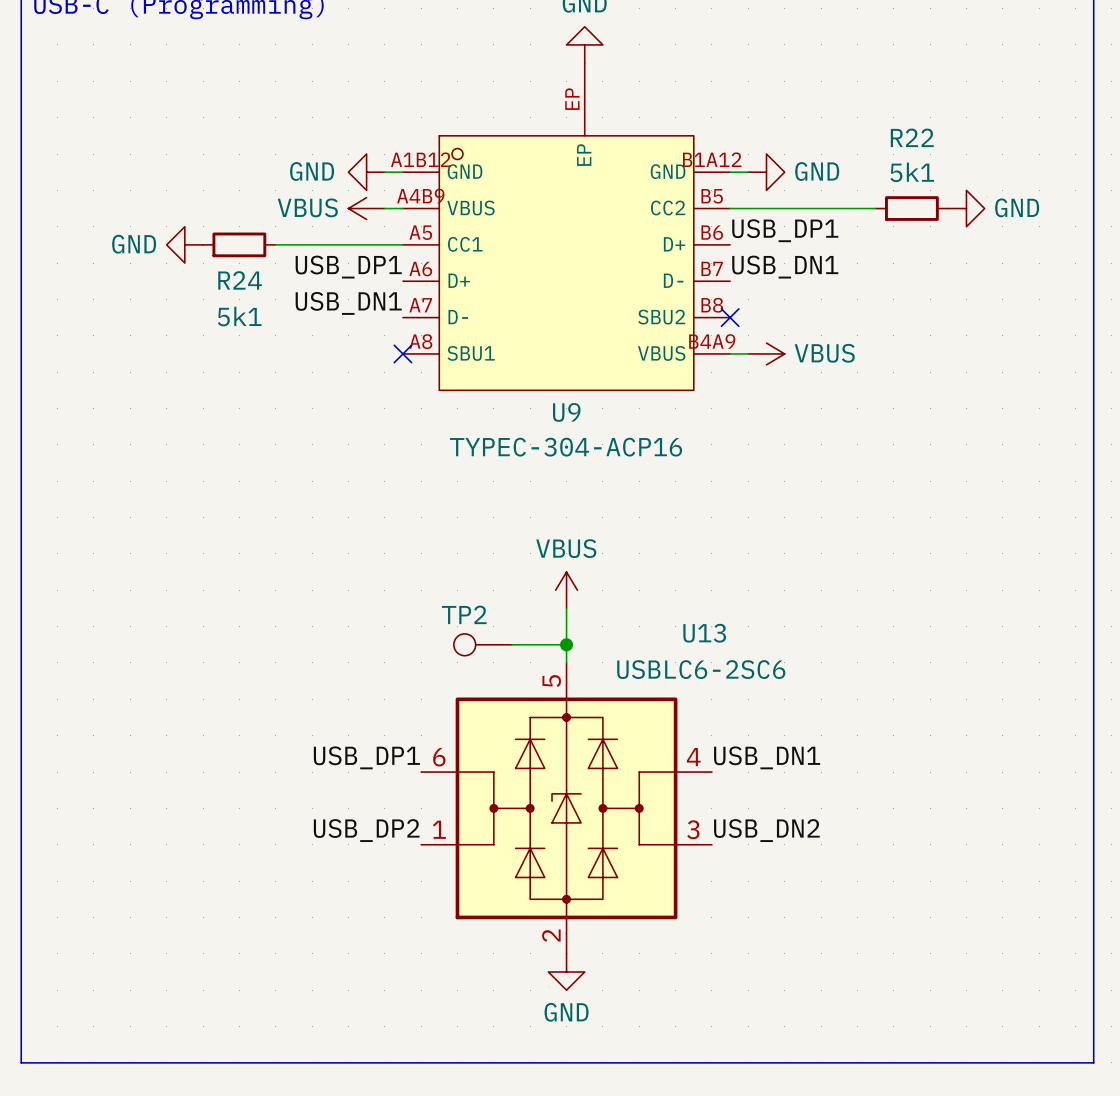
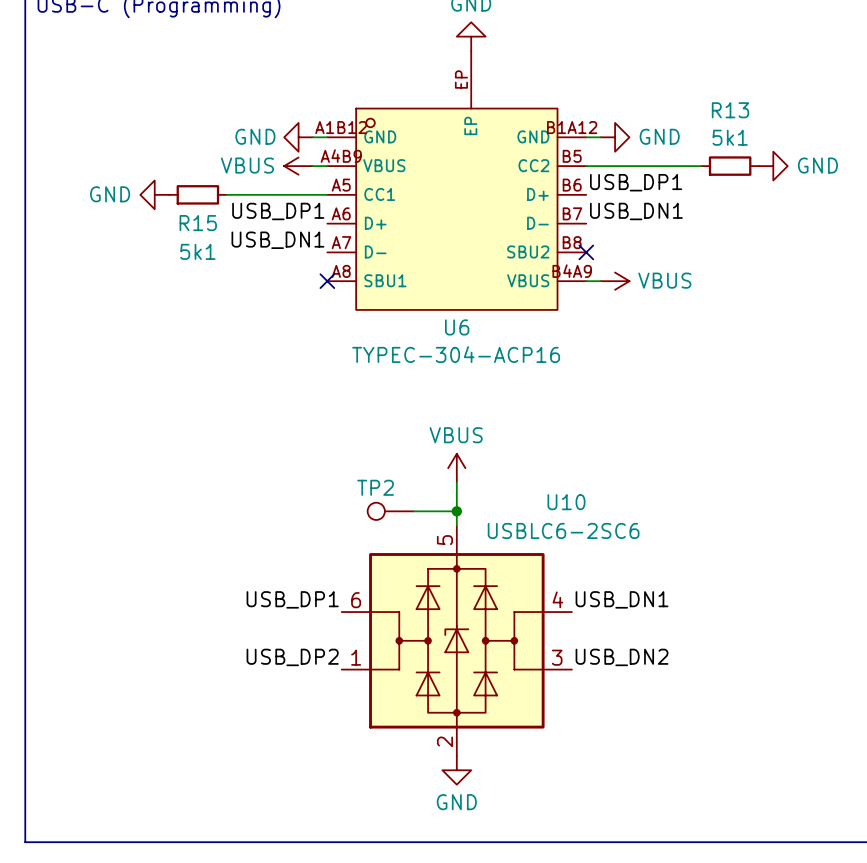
R22 name: R22 (912, 137) -> R13 (730, 110)
R24 name: R24 (240, 280) -> R15 (198, 223)
U9 name: U9 (566, 412) -> U6 (457, 327)
U13 name: U13 (704, 633) -> U10 (566, 502)

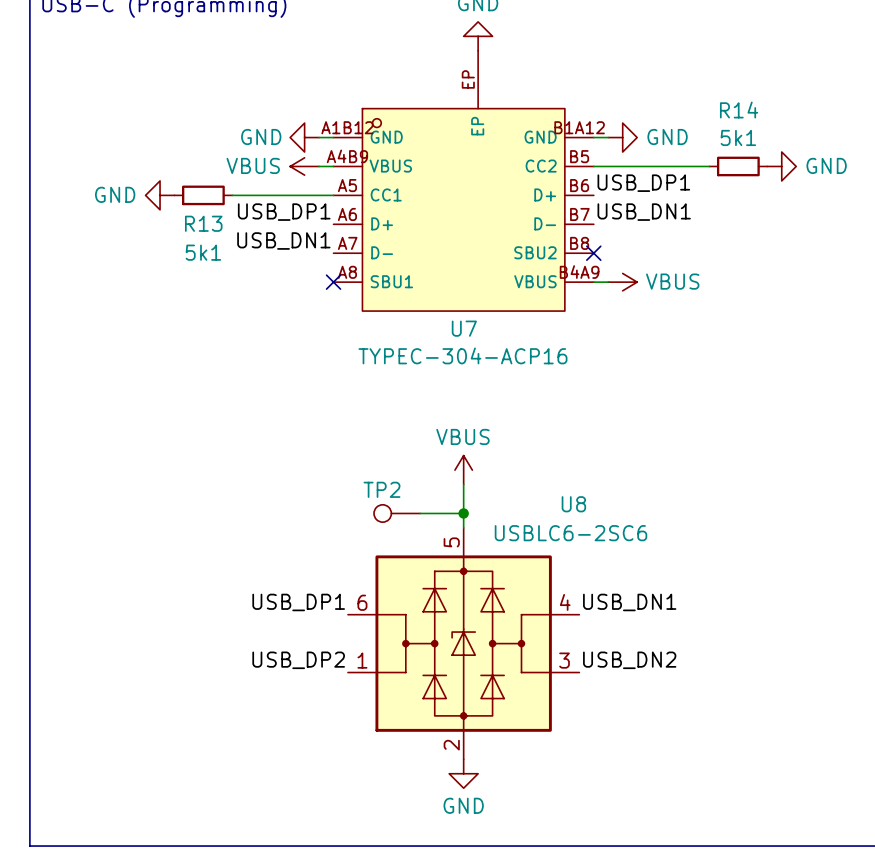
R13 name: R13 (730, 110) -> R14 (739, 110)
R15 name: R15 (198, 223) -> R13 (203, 223)
U6 name: U6 (457, 327) -> U7 (464, 328)
U10 name: U10 (566, 502) -> U8 (573, 504)

